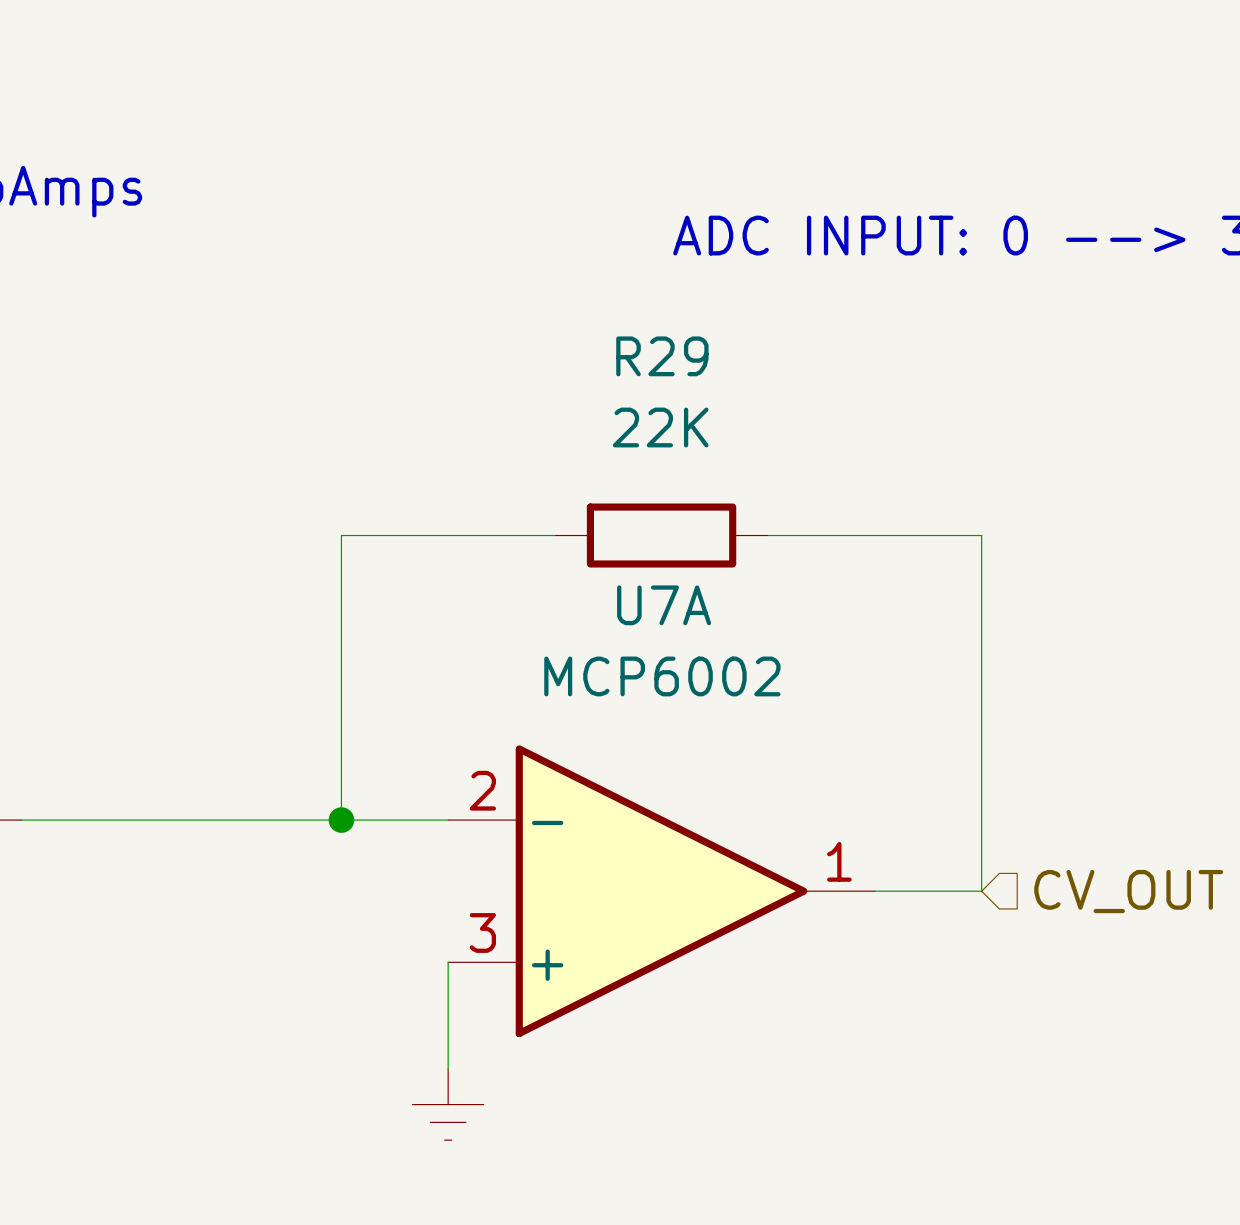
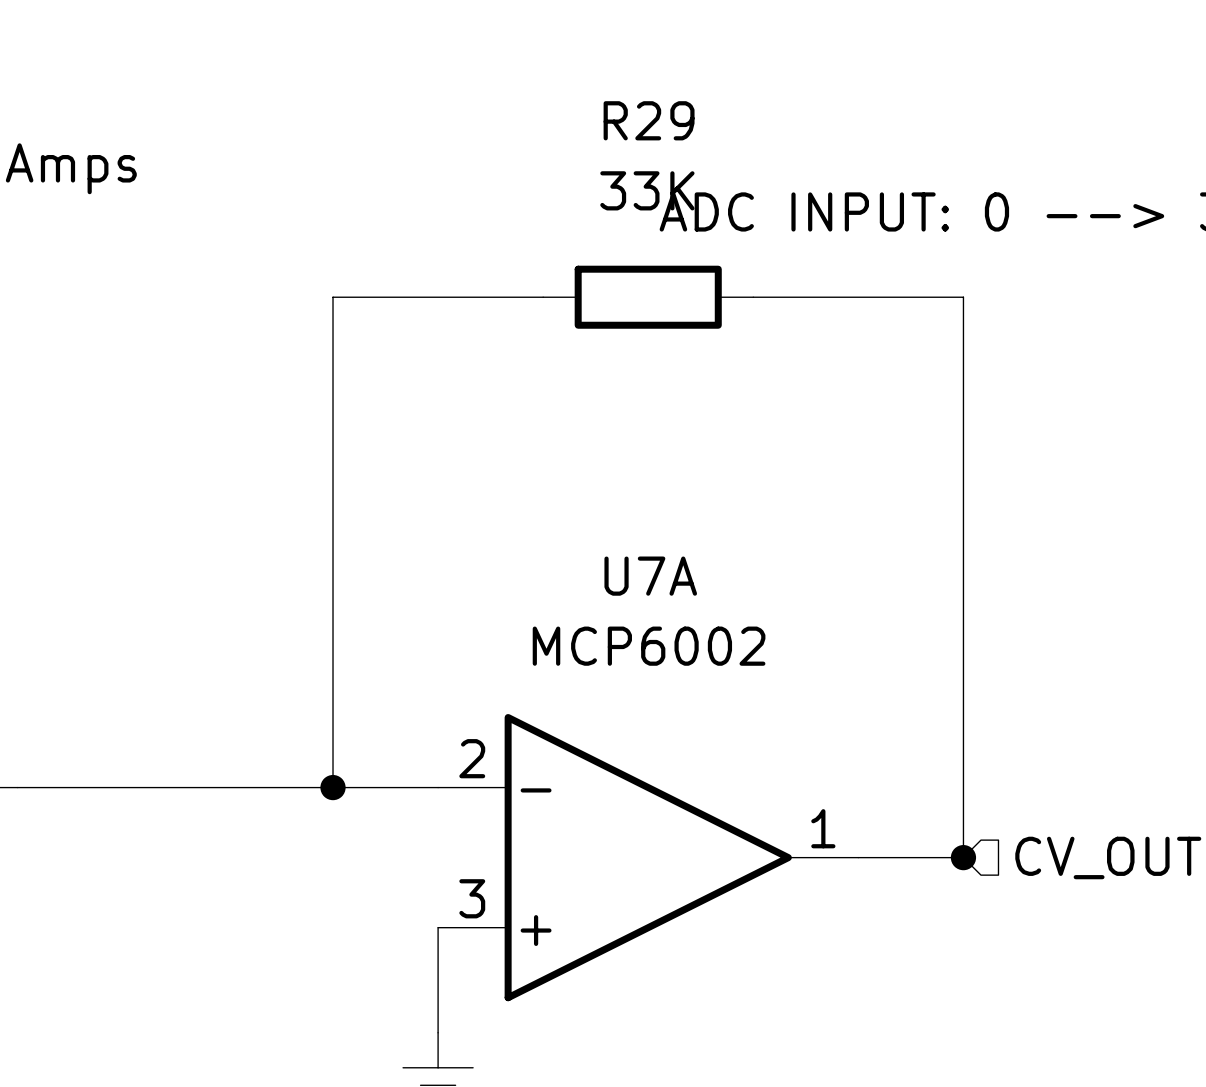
R29 value: 22K (660, 427) -> 33K (647, 190)
wire: (341, 535) (554, 535) -> (333, 507) (333, 297) (543, 297)
R29 position: (661, 535) -> (648, 297)
wire: (768, 535) (981, 535) -> (753, 297) (963, 297) (963, 507)
junction: none -> (963, 857)

